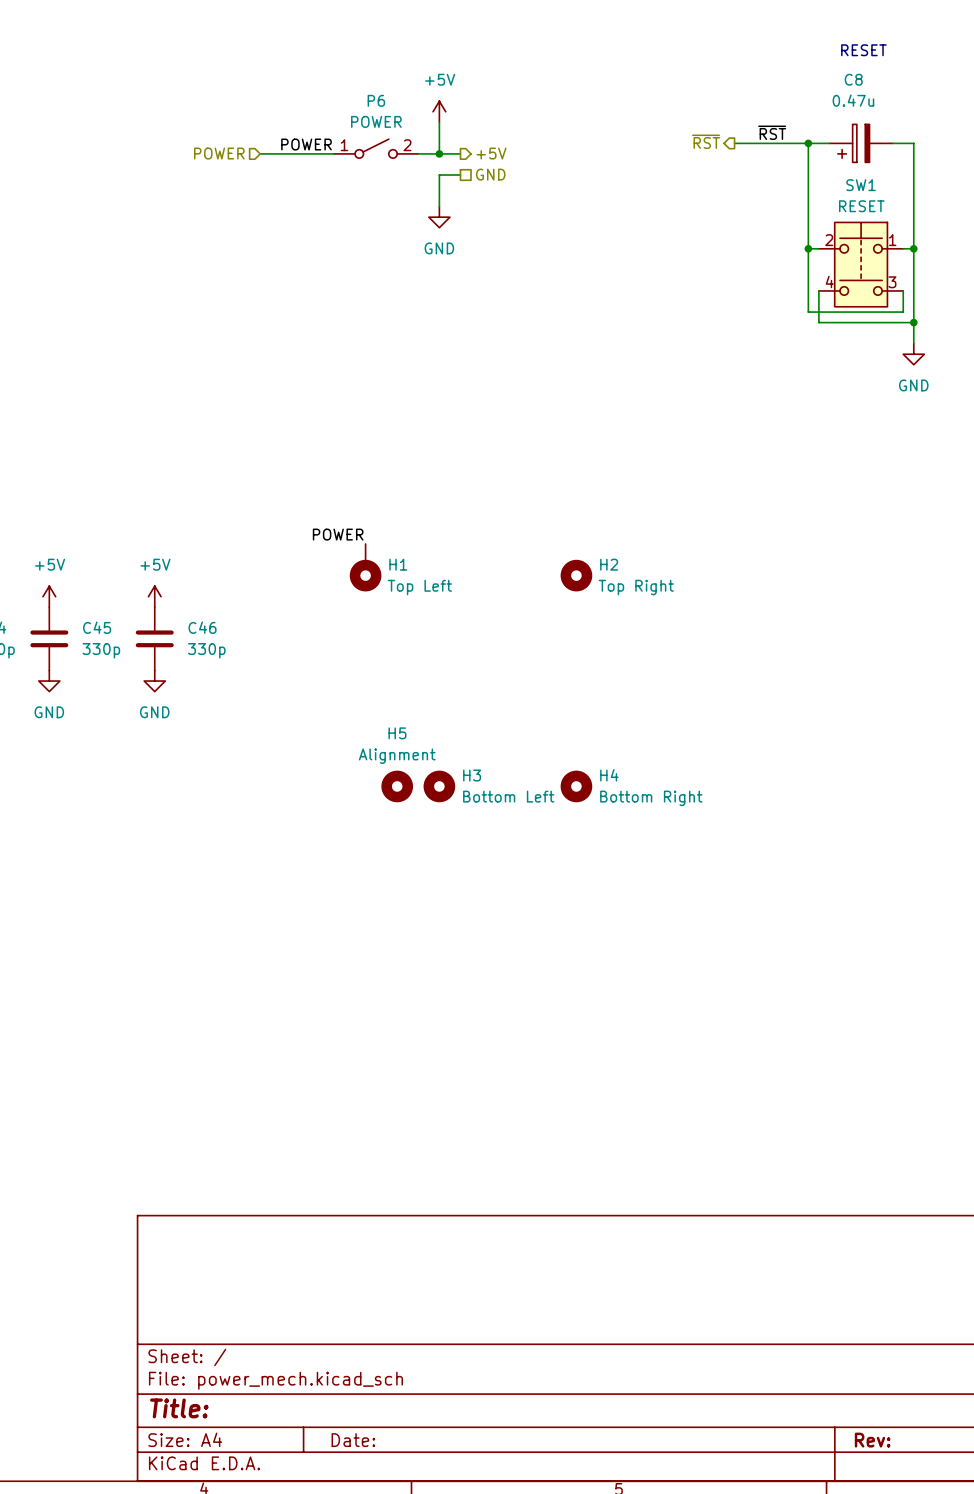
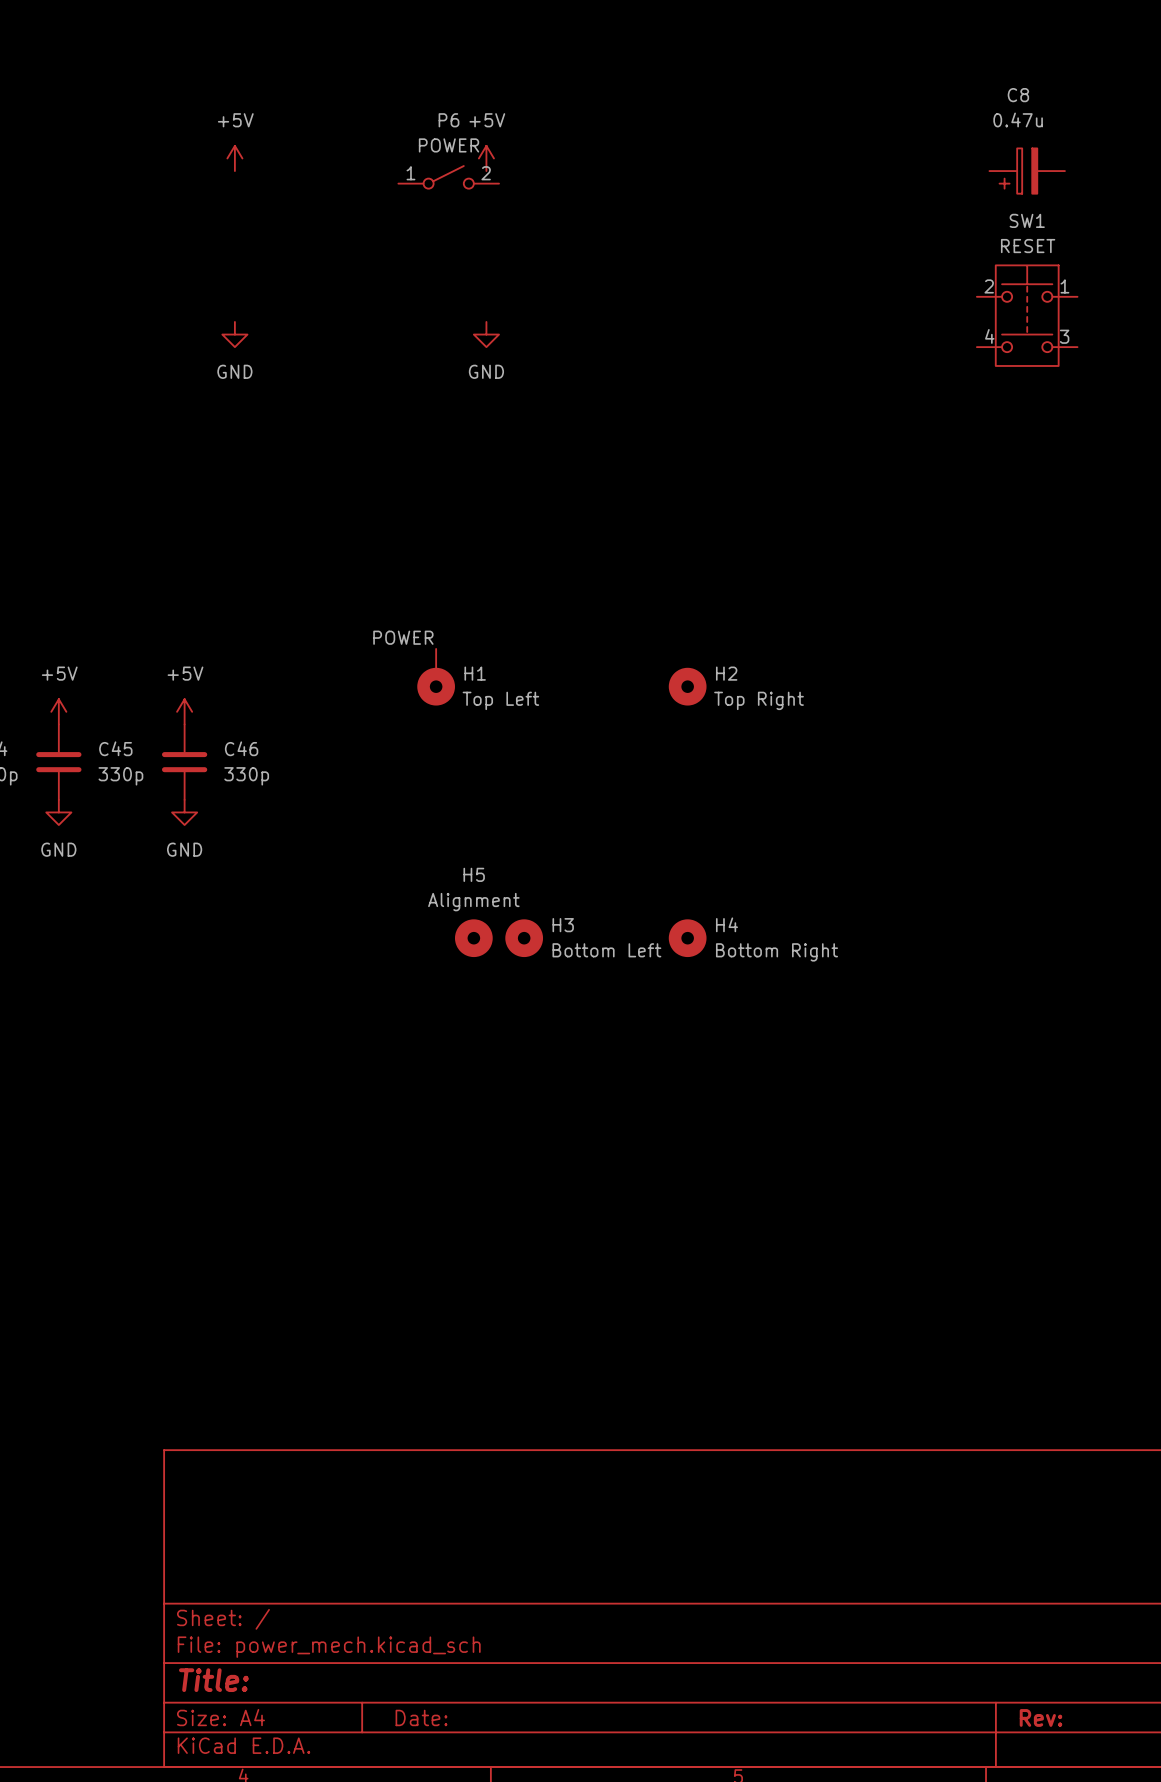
text: RESET (863, 50) -> none
power symbol position: +5V (439, 111) -> +5V (486, 158)
wire: (439, 122) (439, 153) -> none
power symbol: none -> +5V (234, 158)
label: ~{RST} (772, 132) -> none
hierarchical label: ~{RST} (706, 141) -> none
wire: (734, 143) (829, 143) -> none
wire: (808, 143) (808, 312) (903, 312) (903, 290) -> none
junction: (808, 143) -> none
wire: (892, 143) (913, 143) (913, 343) -> none
label: POWER (306, 144) -> none
hierarchical label: POWER (219, 153) -> none
wire: (260, 153) (333, 153) -> none
wire: (418, 153) (460, 153) -> none
junction: (439, 153) -> none
hierarchical label: +5V (491, 153) -> none
hierarchical label: GND (490, 174) -> none
wire: (460, 175) (439, 175) (439, 206) -> none
power symbol position: GND (439, 217) -> GND (486, 334)
wire: (808, 248) (818, 248) -> none
junction: (808, 248) -> none
wire: (903, 248) (913, 248) -> none
junction: (913, 248) -> none
power symbol: none -> GND (234, 334)
wire: (818, 290) (818, 322) (913, 322) -> none
junction: (913, 322) -> none
power symbol: GND (913, 354) -> none

